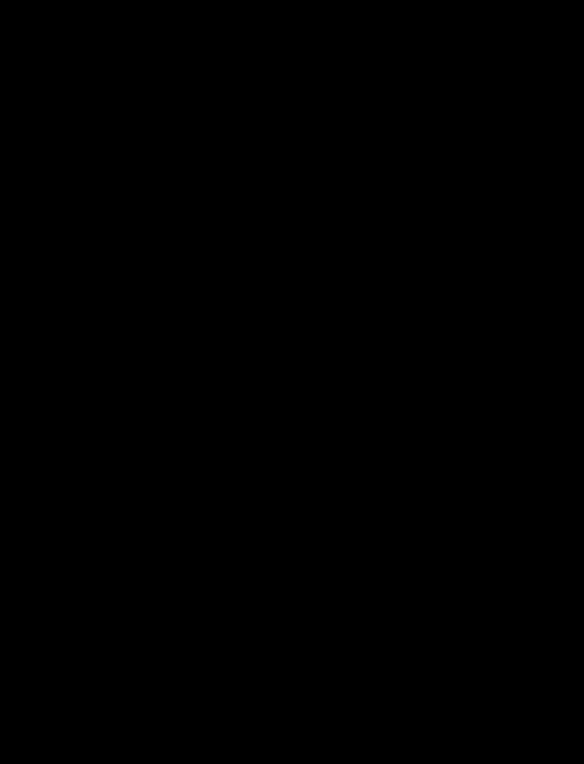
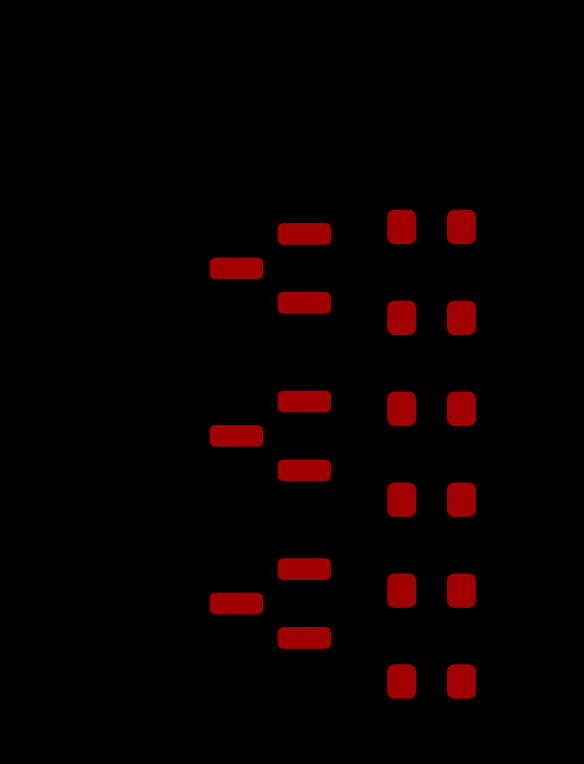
part: none -> (431, 226)
part: none -> (270, 268)
part: none -> (431, 317)
part: none -> (431, 408)
part: none -> (270, 435)
part: none -> (431, 499)
part: none -> (431, 590)
part: none -> (270, 603)
part: none -> (431, 681)

